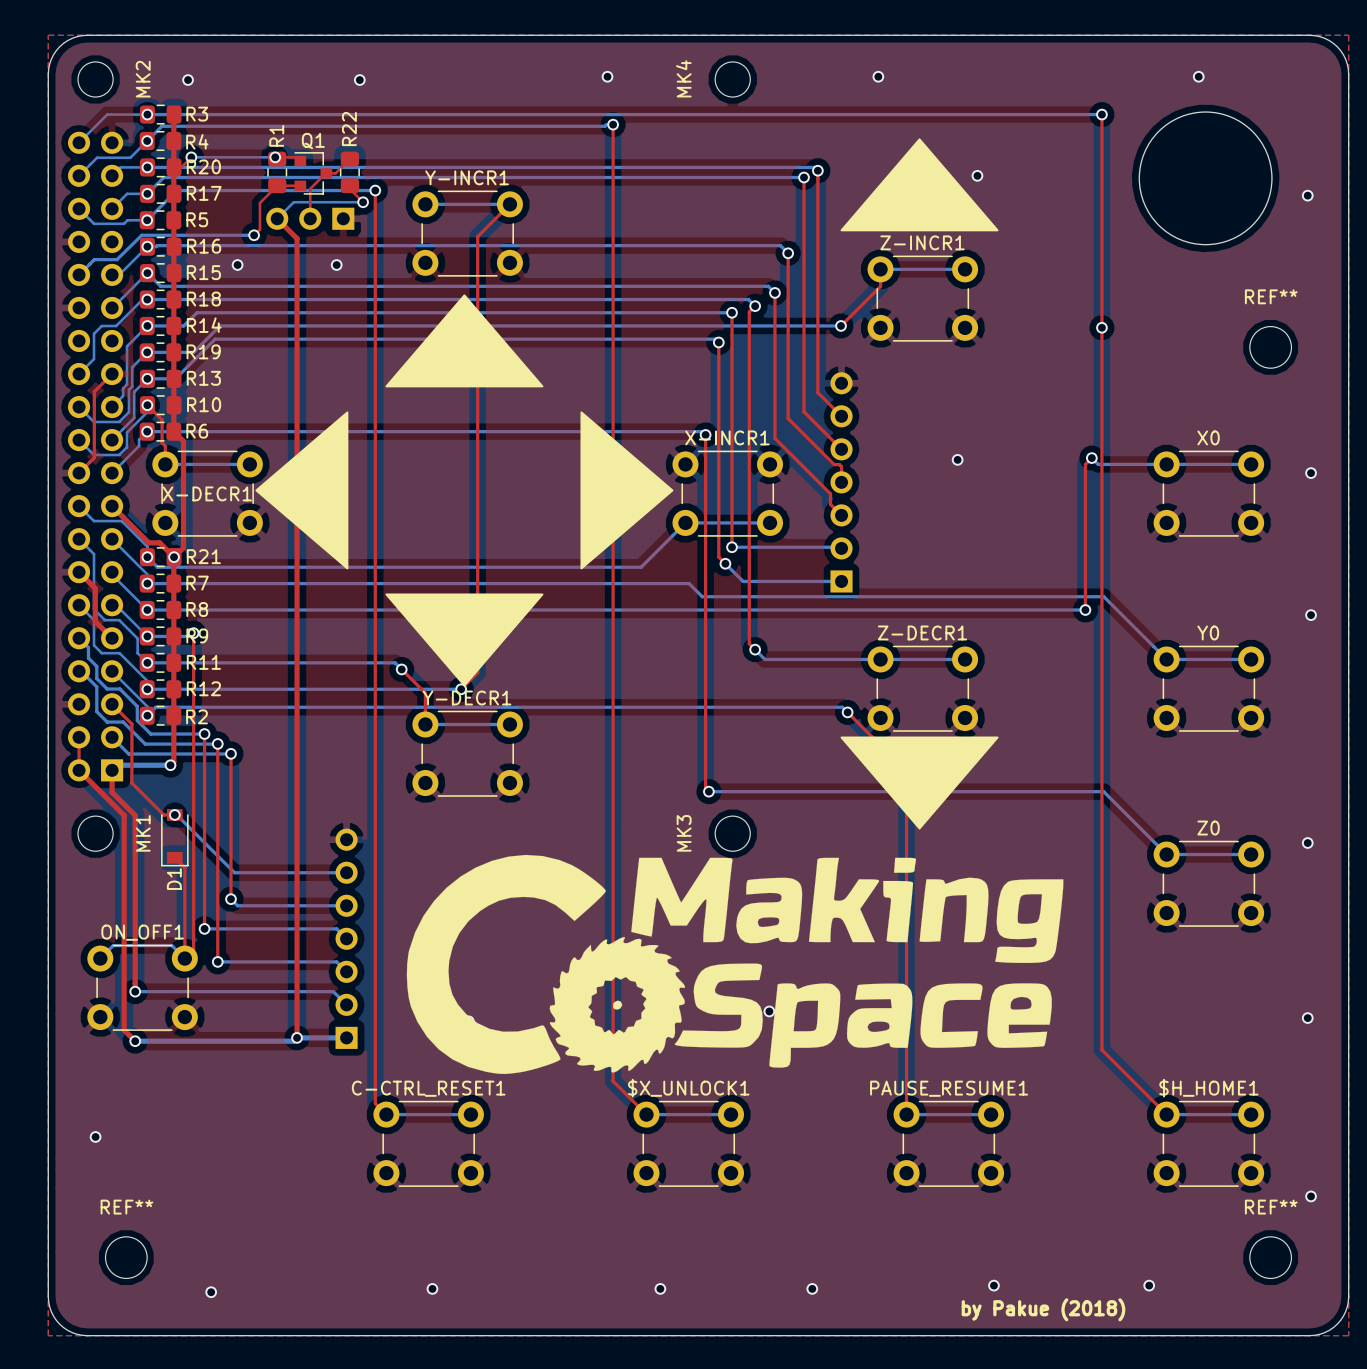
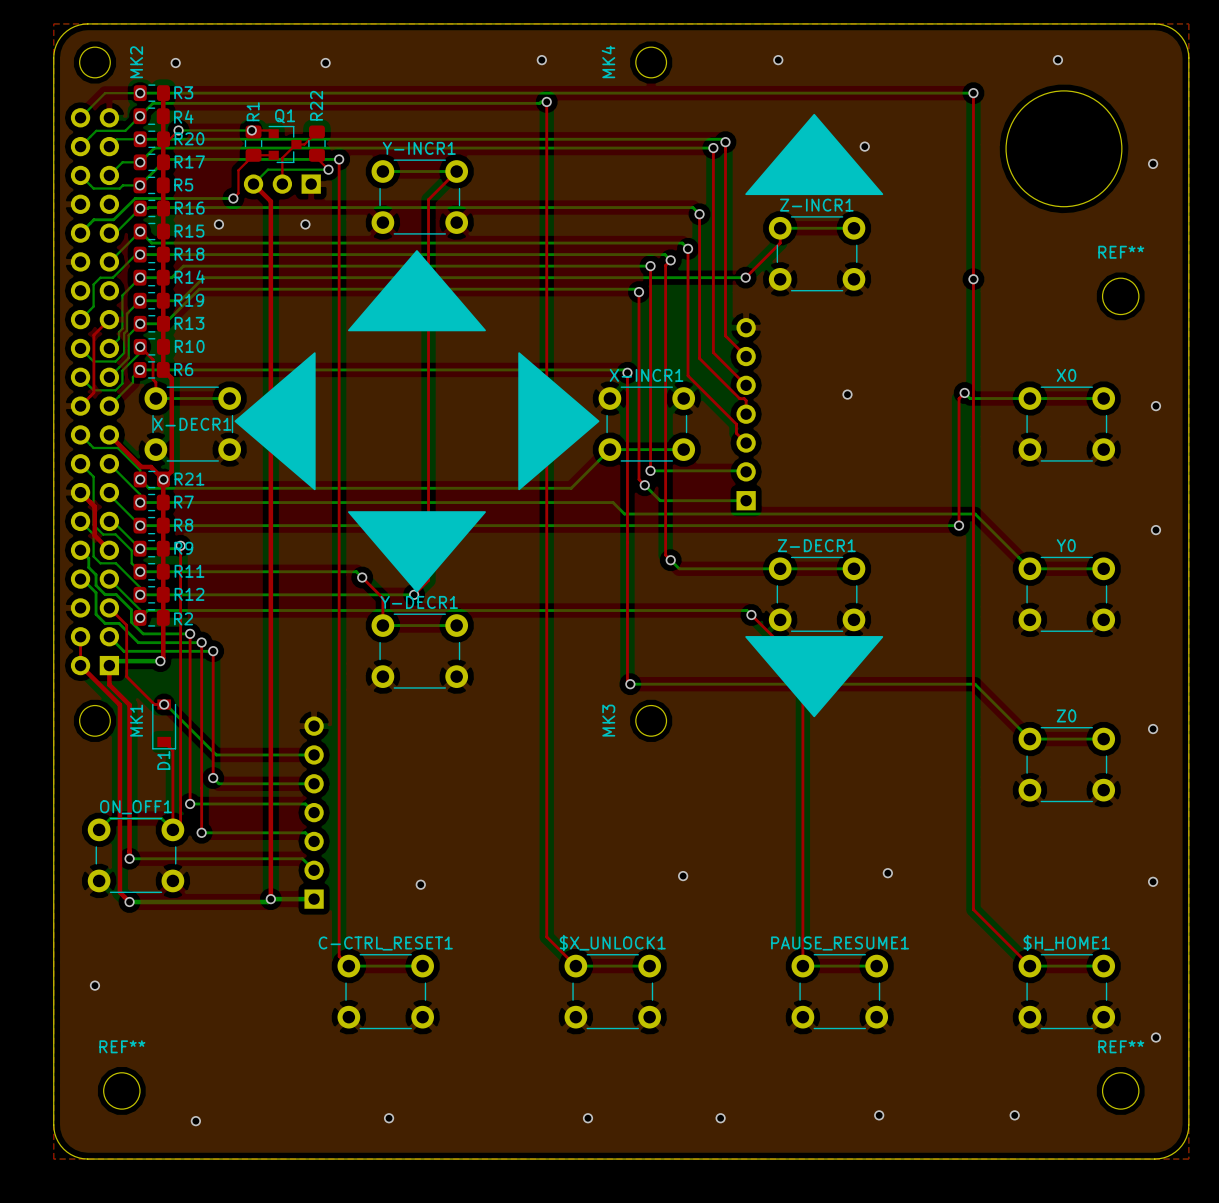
drawing: [406, 854, 1064, 1075] -> none
text: by Pakue (2018) (1043, 1309) -> none

